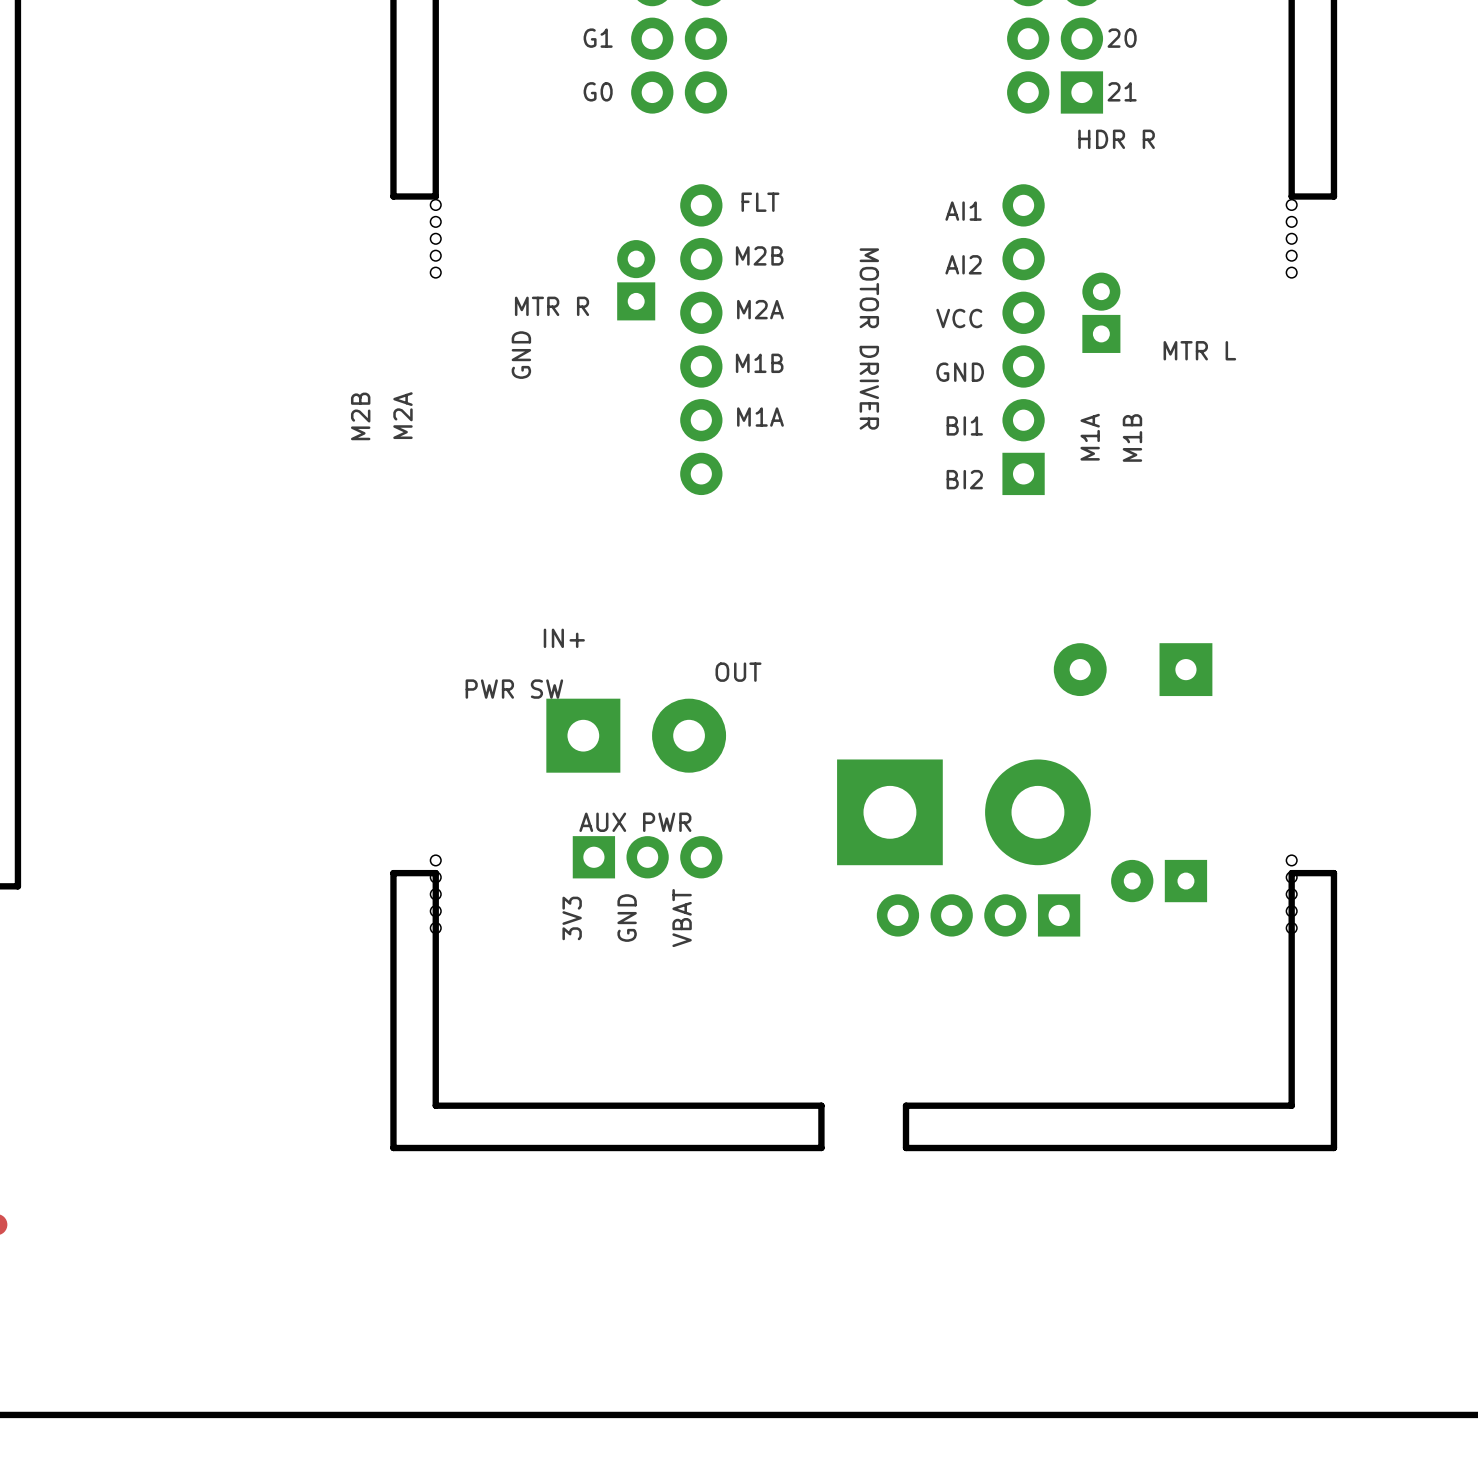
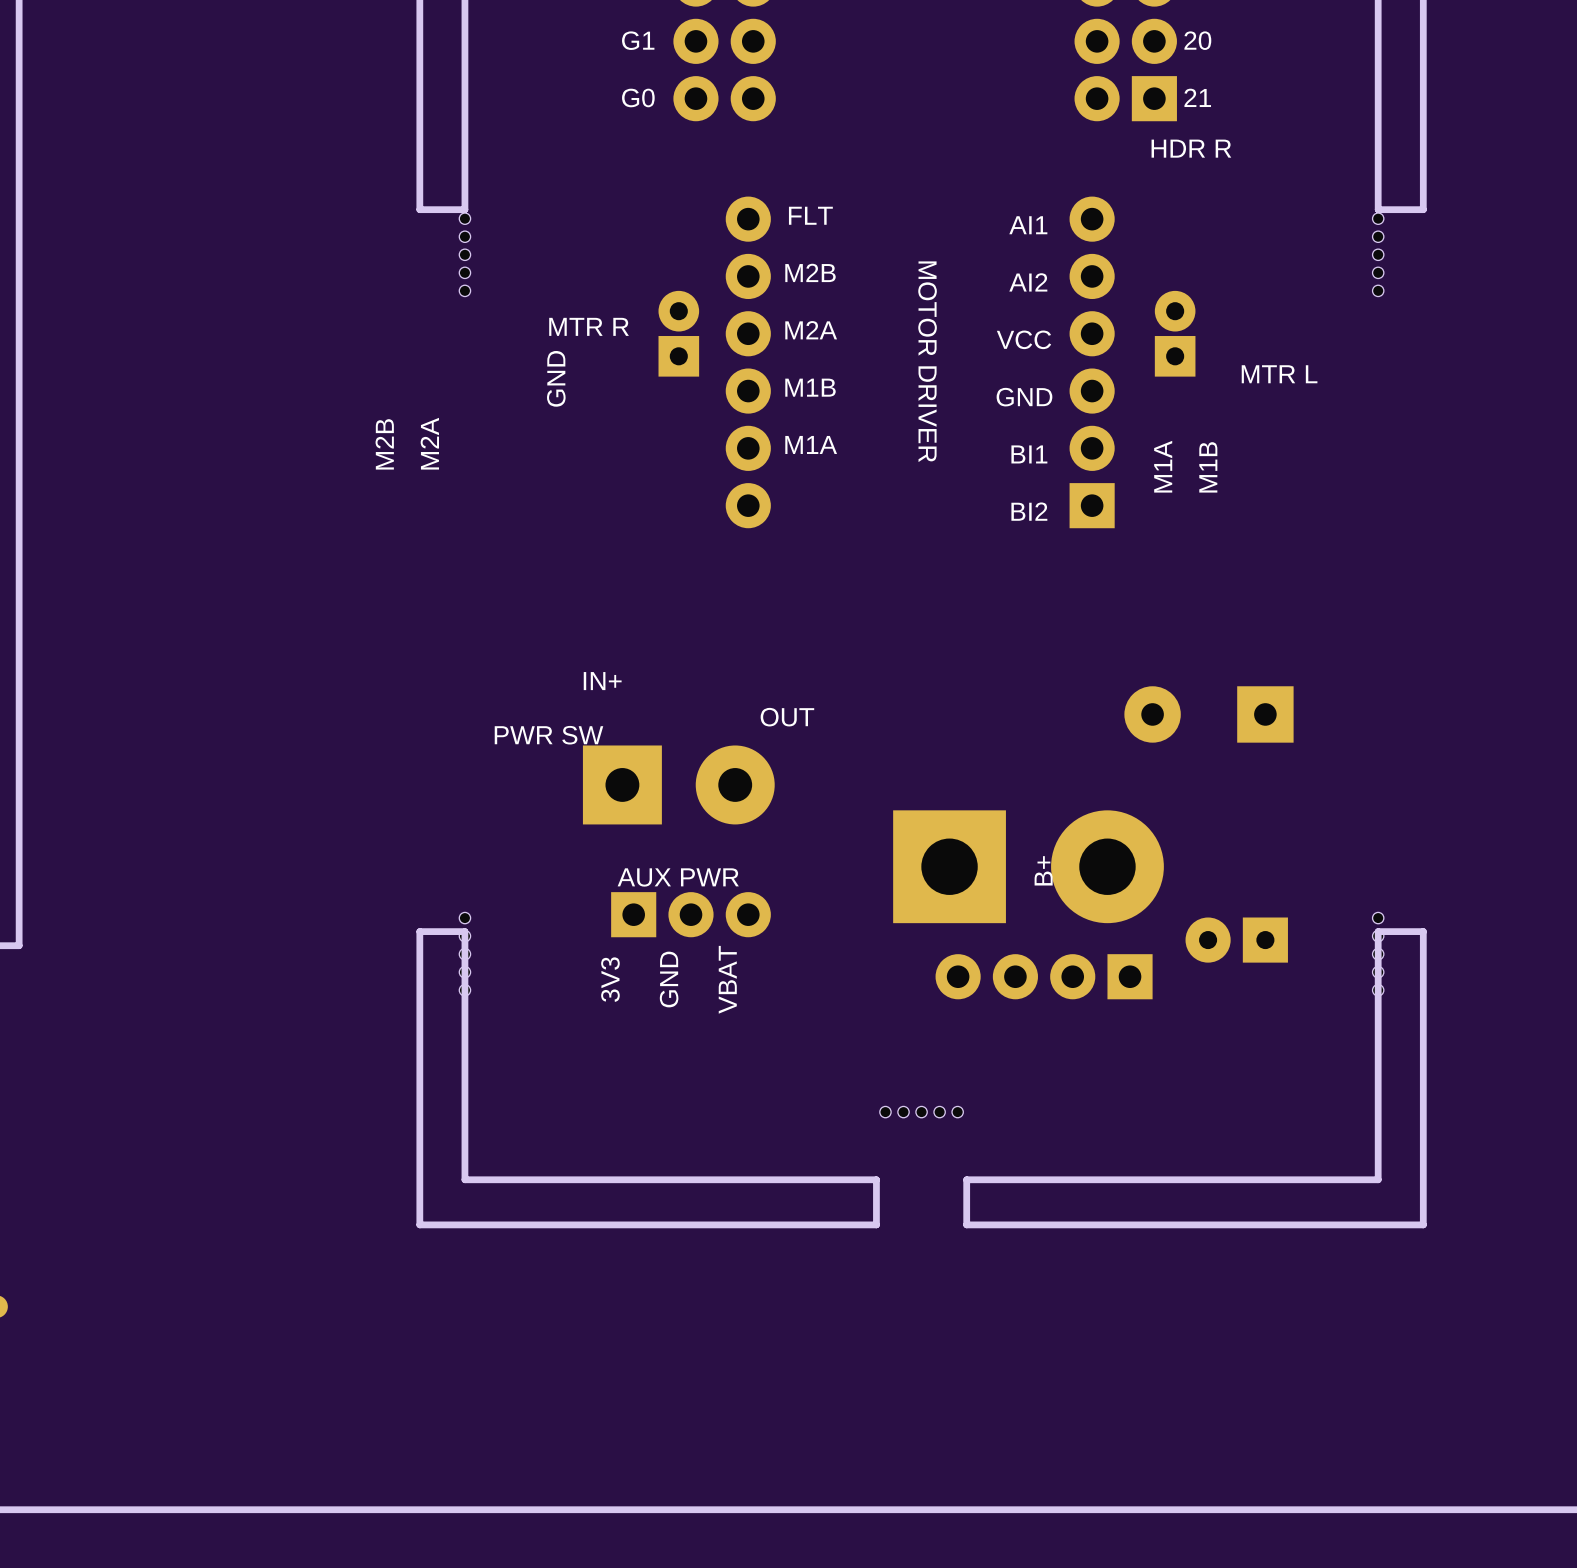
part position: (636, 280) -> (678, 333)
text: none -> B+ (1043, 870)
part: none -> (921, 1112)

